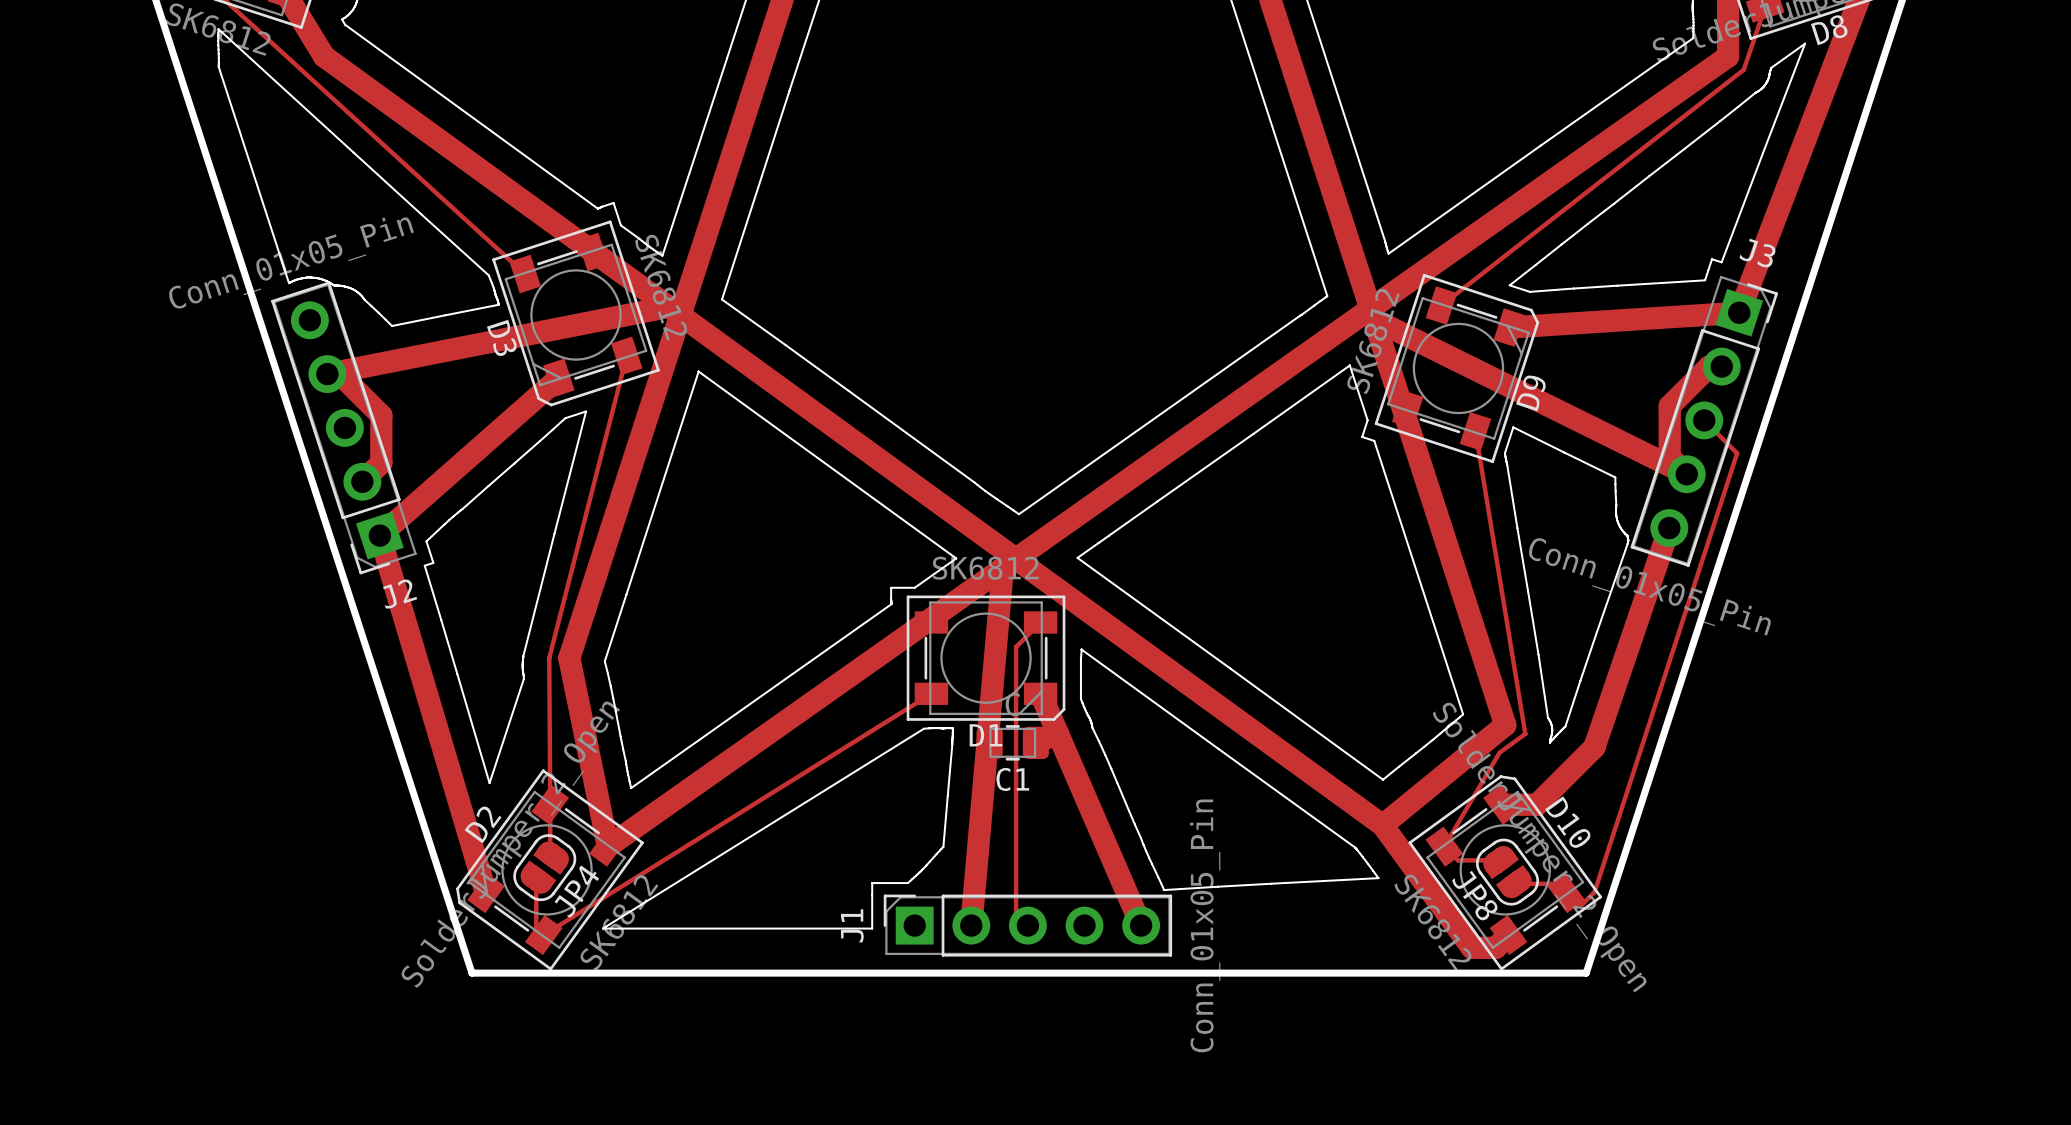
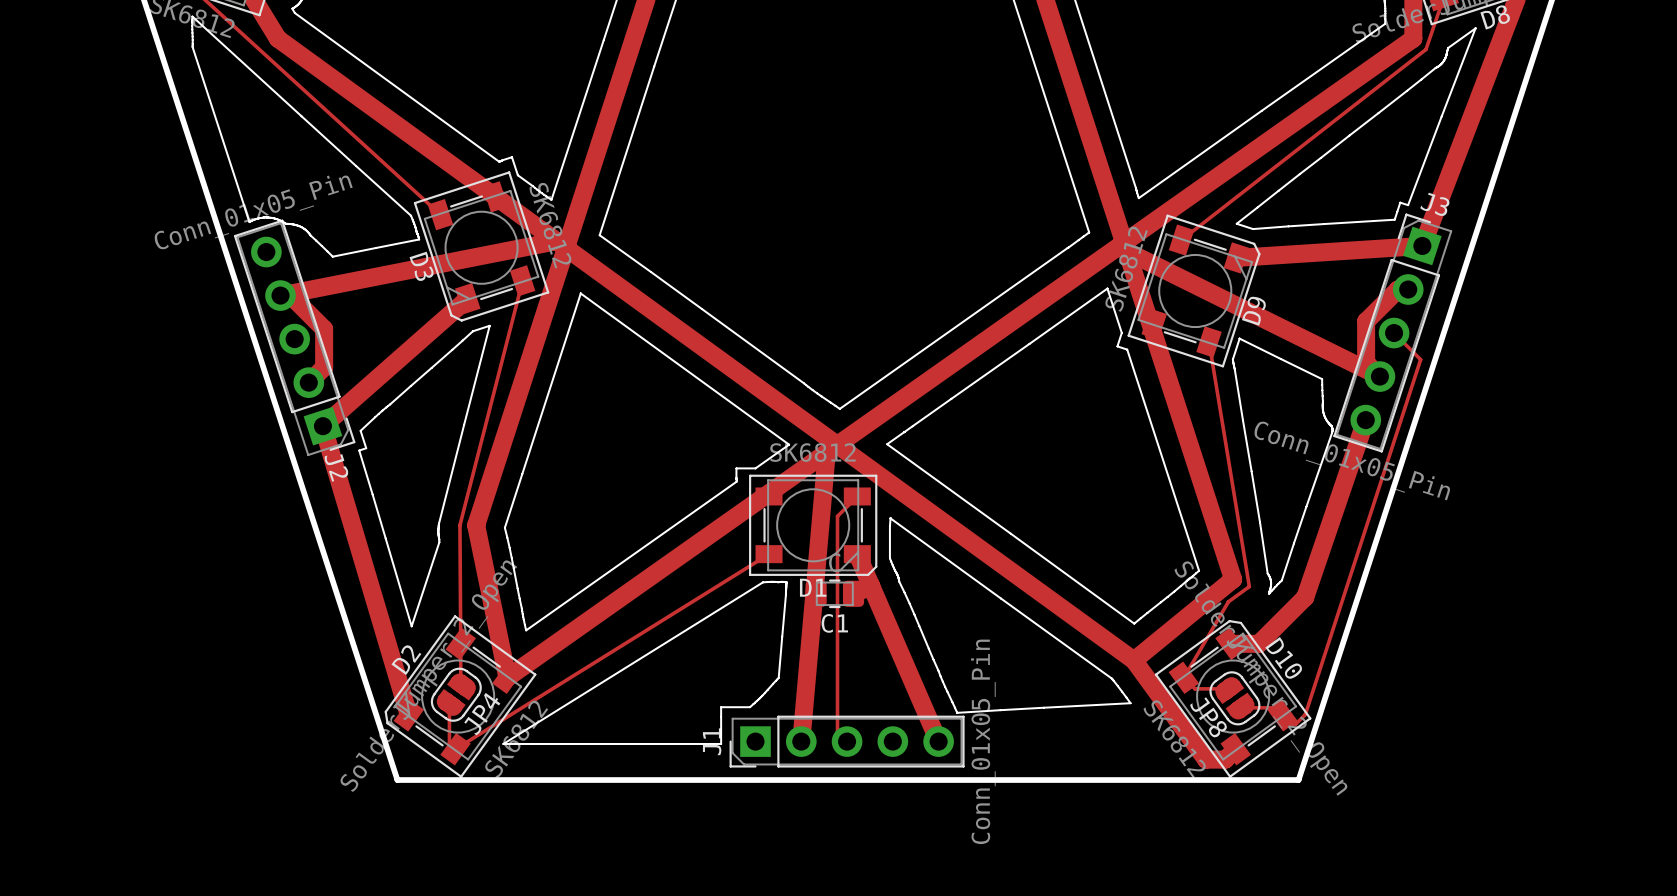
J3 footprint: [1630, 275, 1778, 567] -> [1333, 213, 1453, 453]
J2 footprint: [271, 281, 417, 575] -> [233, 219, 356, 456]
J1 footprint: [883, 894, 1173, 957] -> [729, 715, 965, 768]

